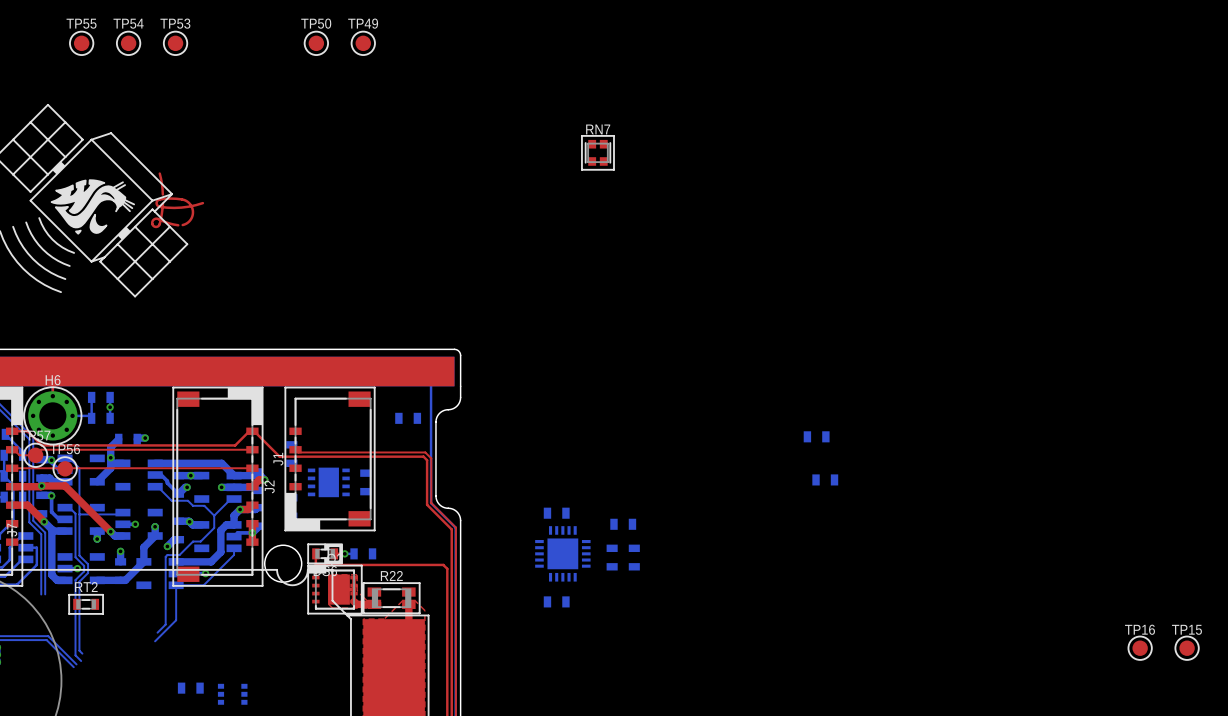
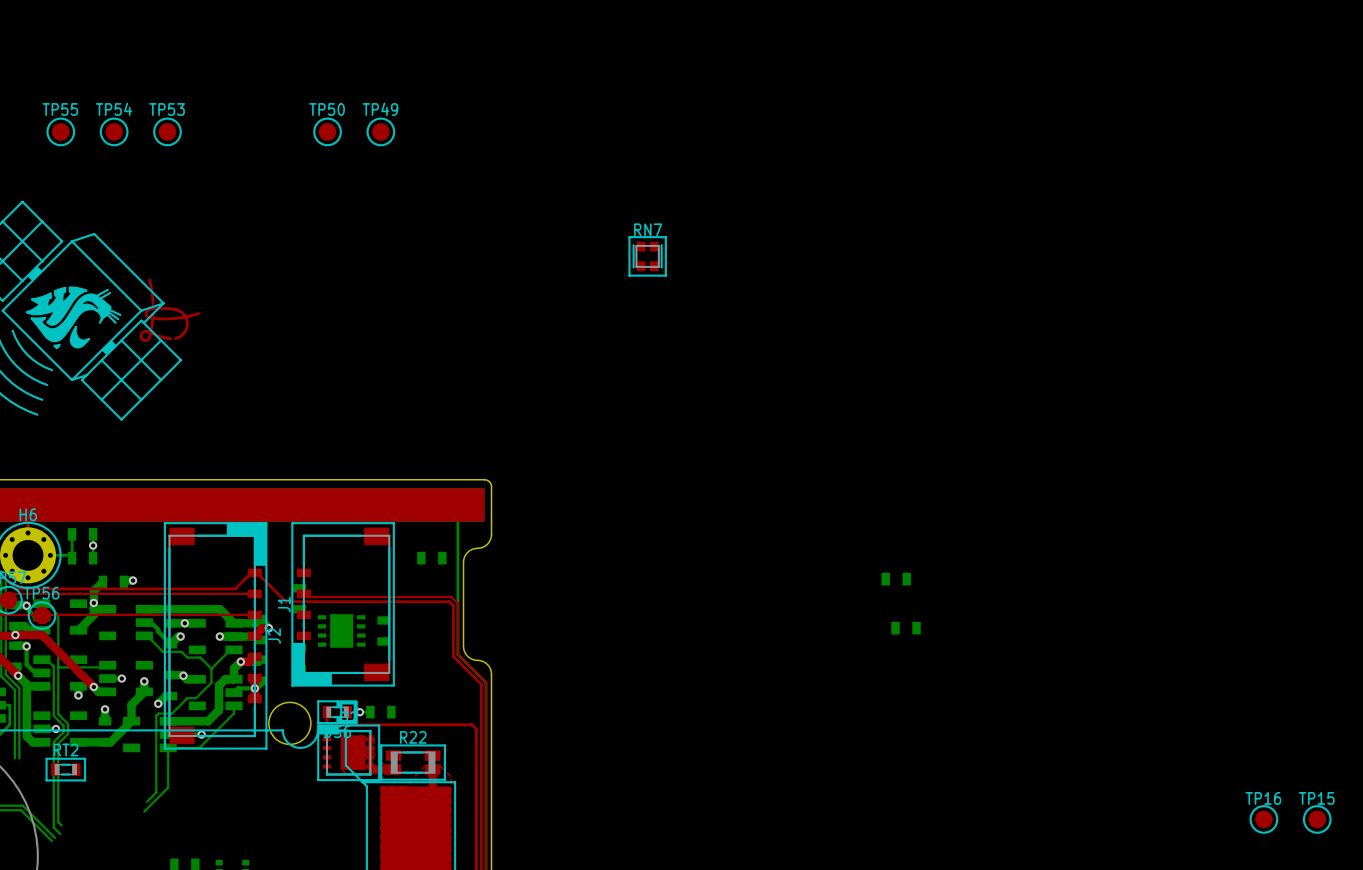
part: (556, 513) -> none
part: (623, 524) -> none
part: (562, 553) -> none
part: (612, 557) -> none
part: (634, 557) -> none
part: (556, 601) -> none

